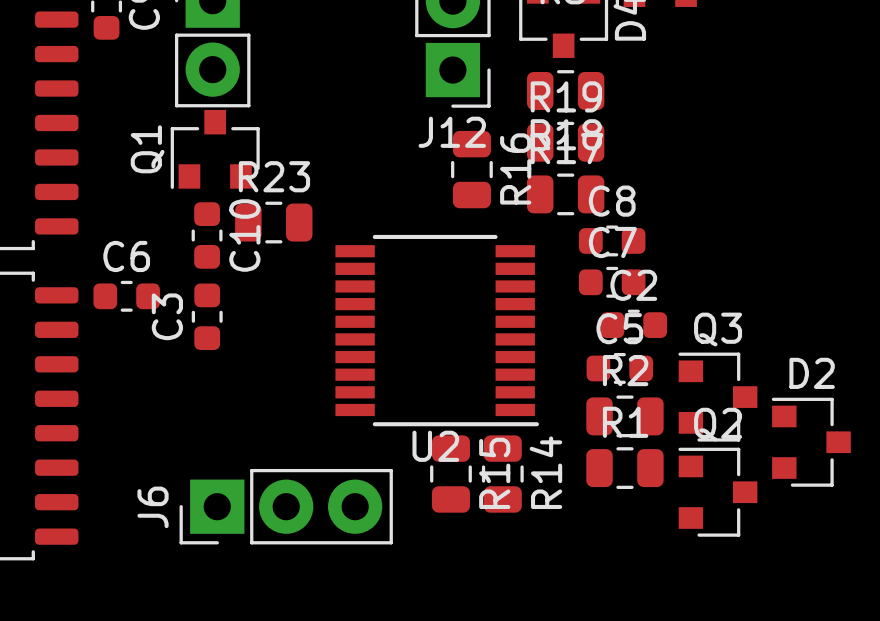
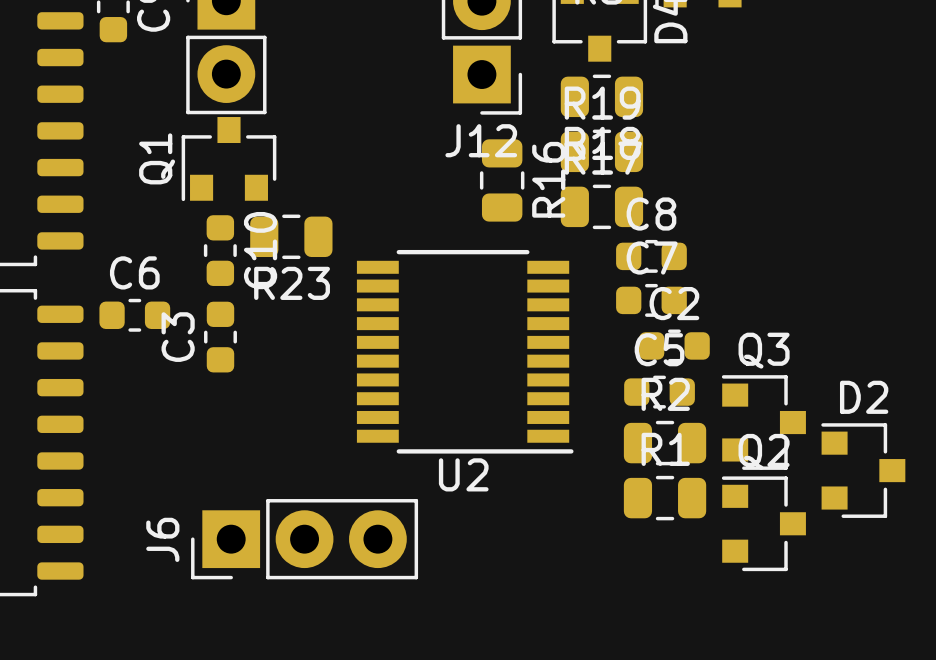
R23 name position: R23 (274, 176) -> R23 (292, 283)
R15: (450, 474) -> none
R14: (502, 474) -> none

